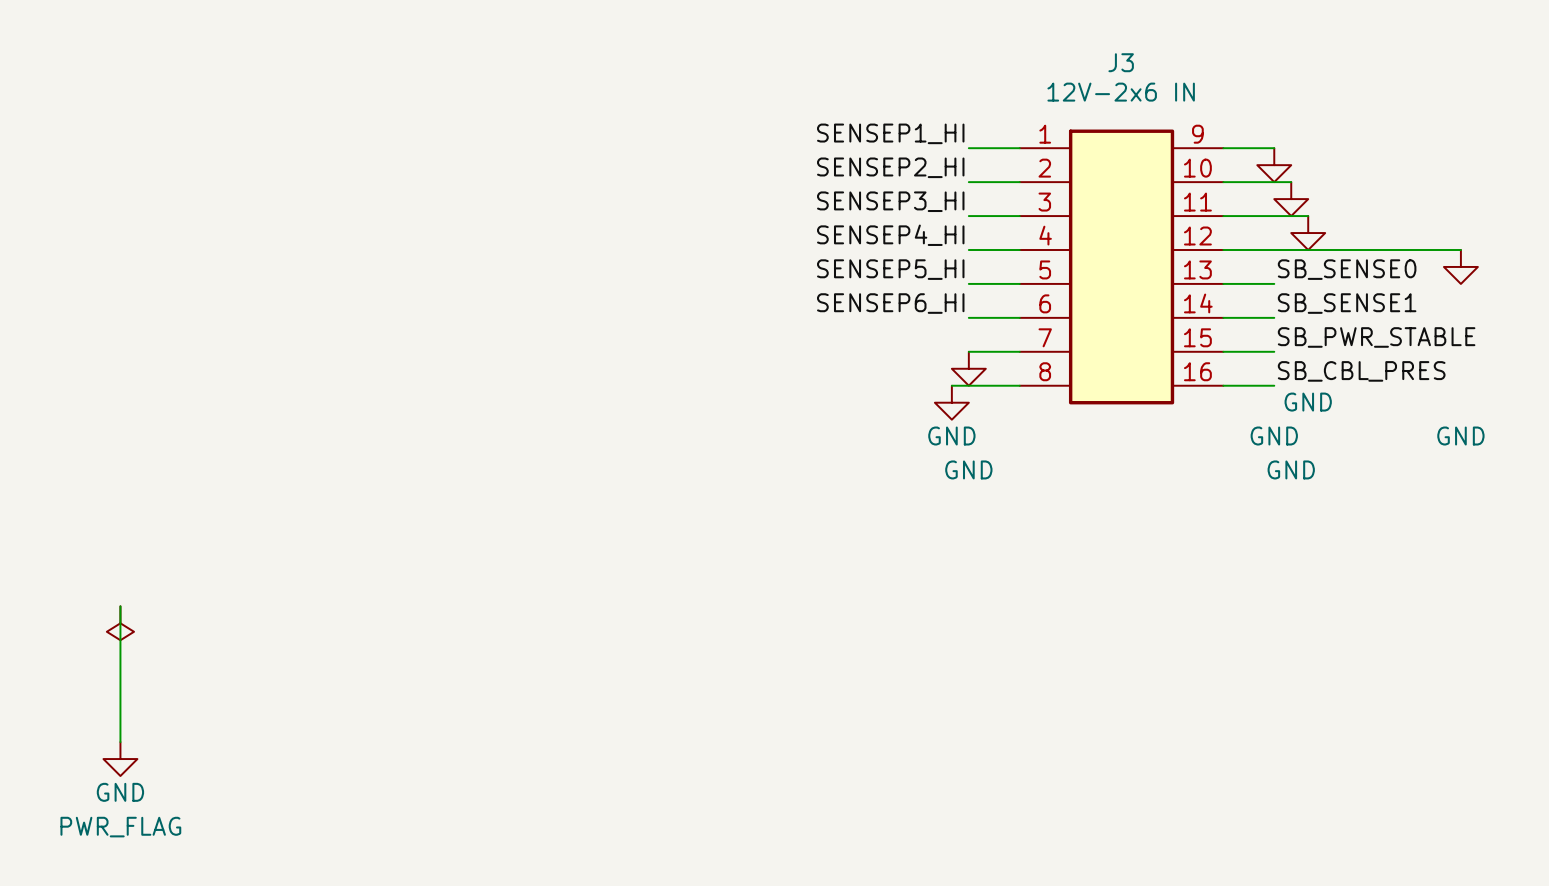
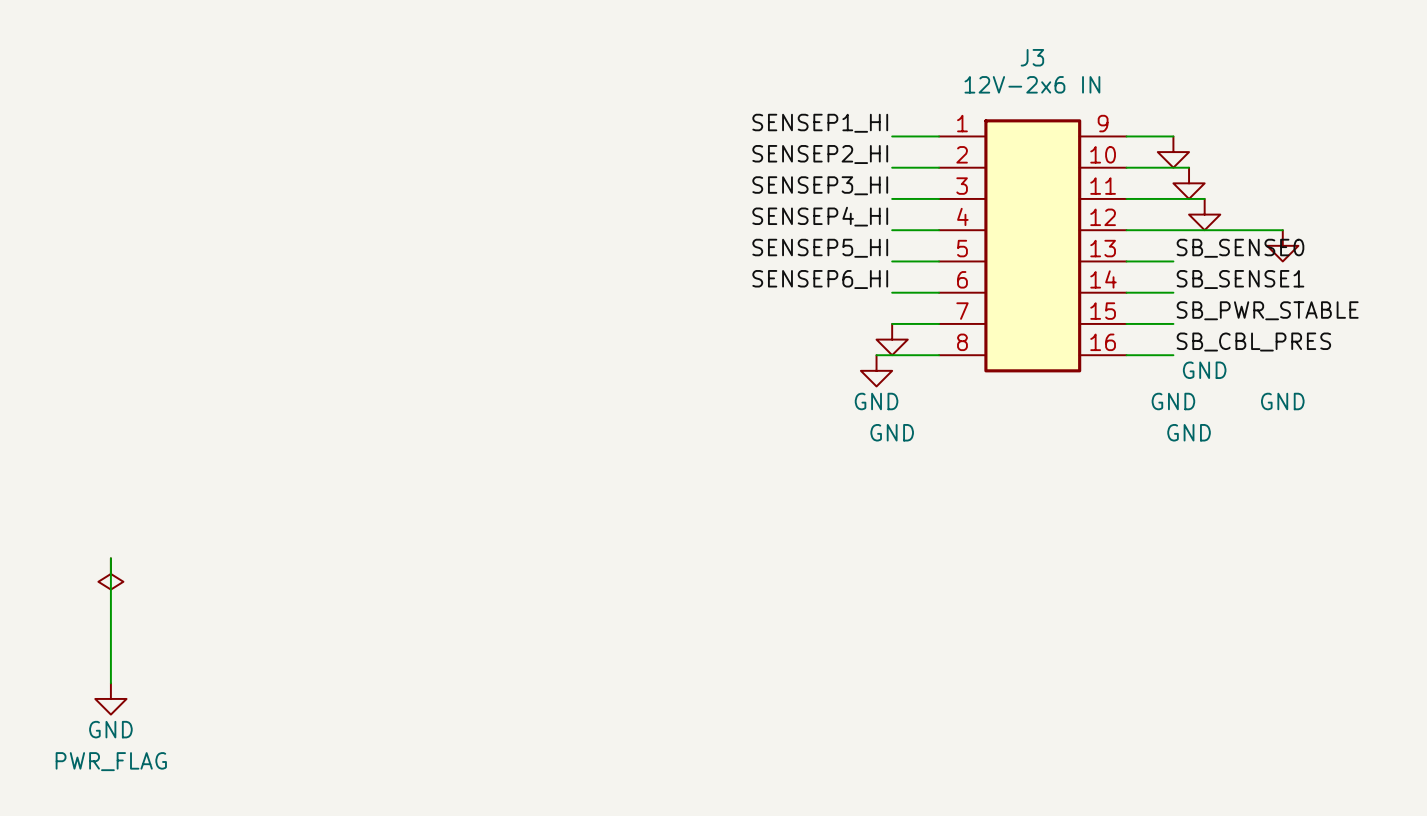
wire: (1393, 250) (1460, 250) -> none
power symbol position: GND (1460, 266) -> GND (1282, 245)

